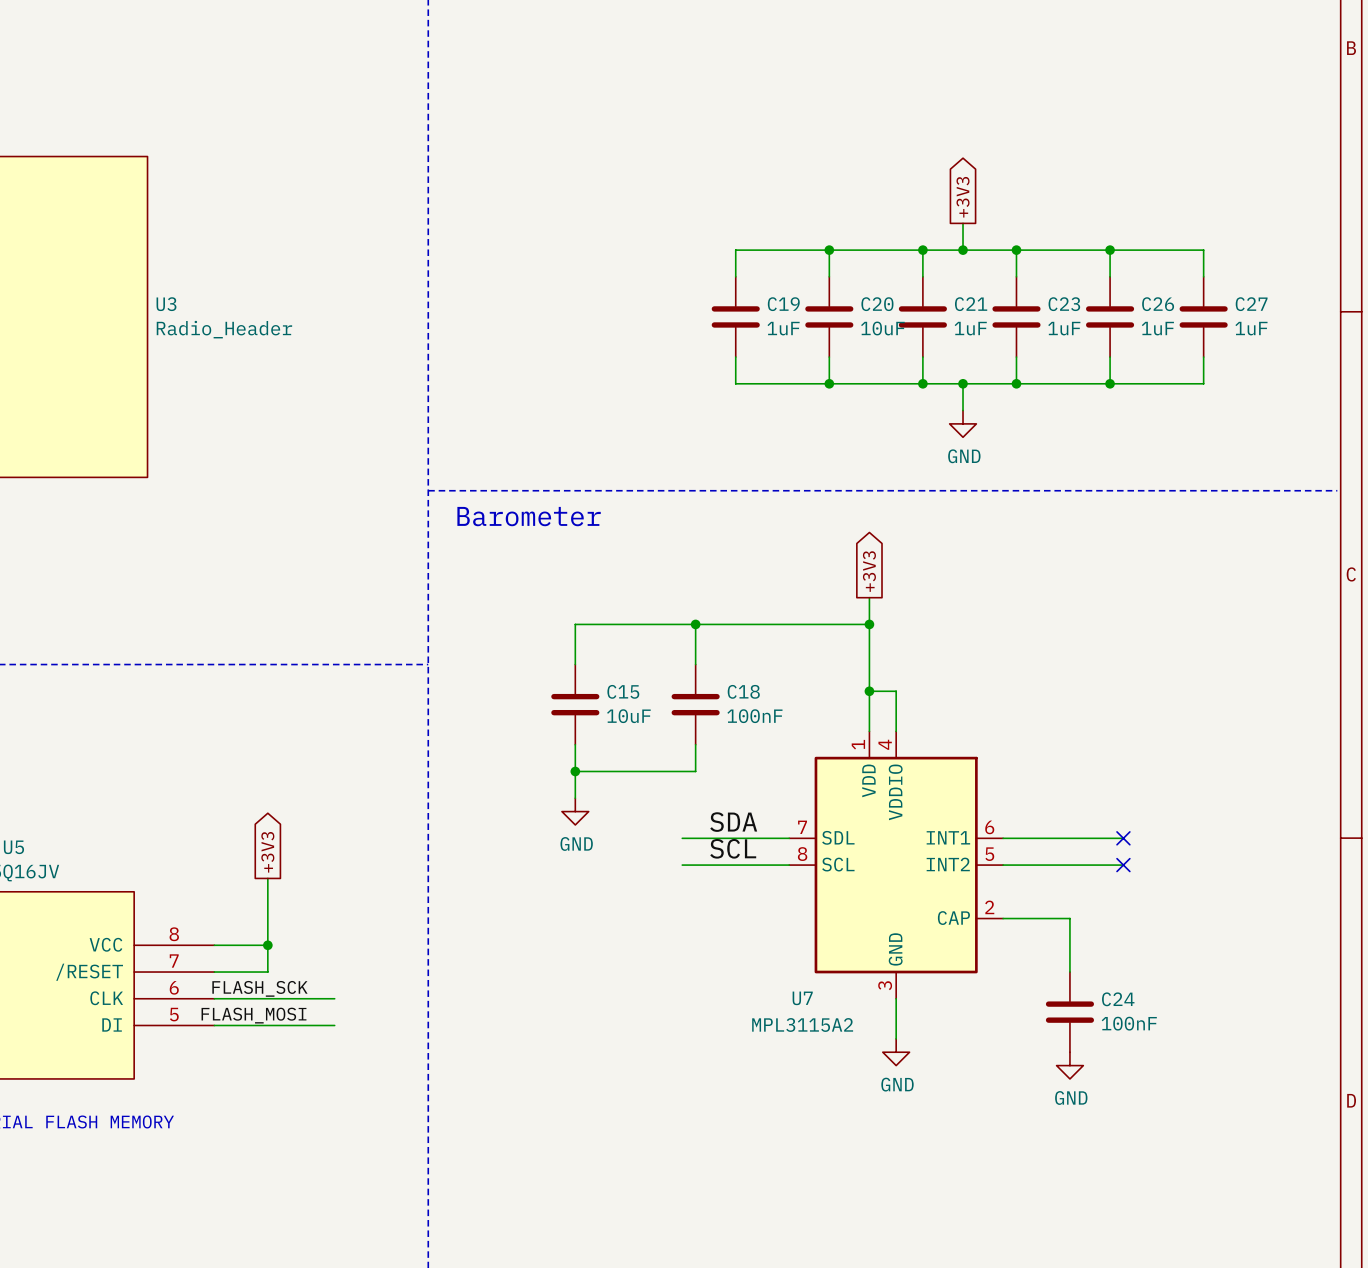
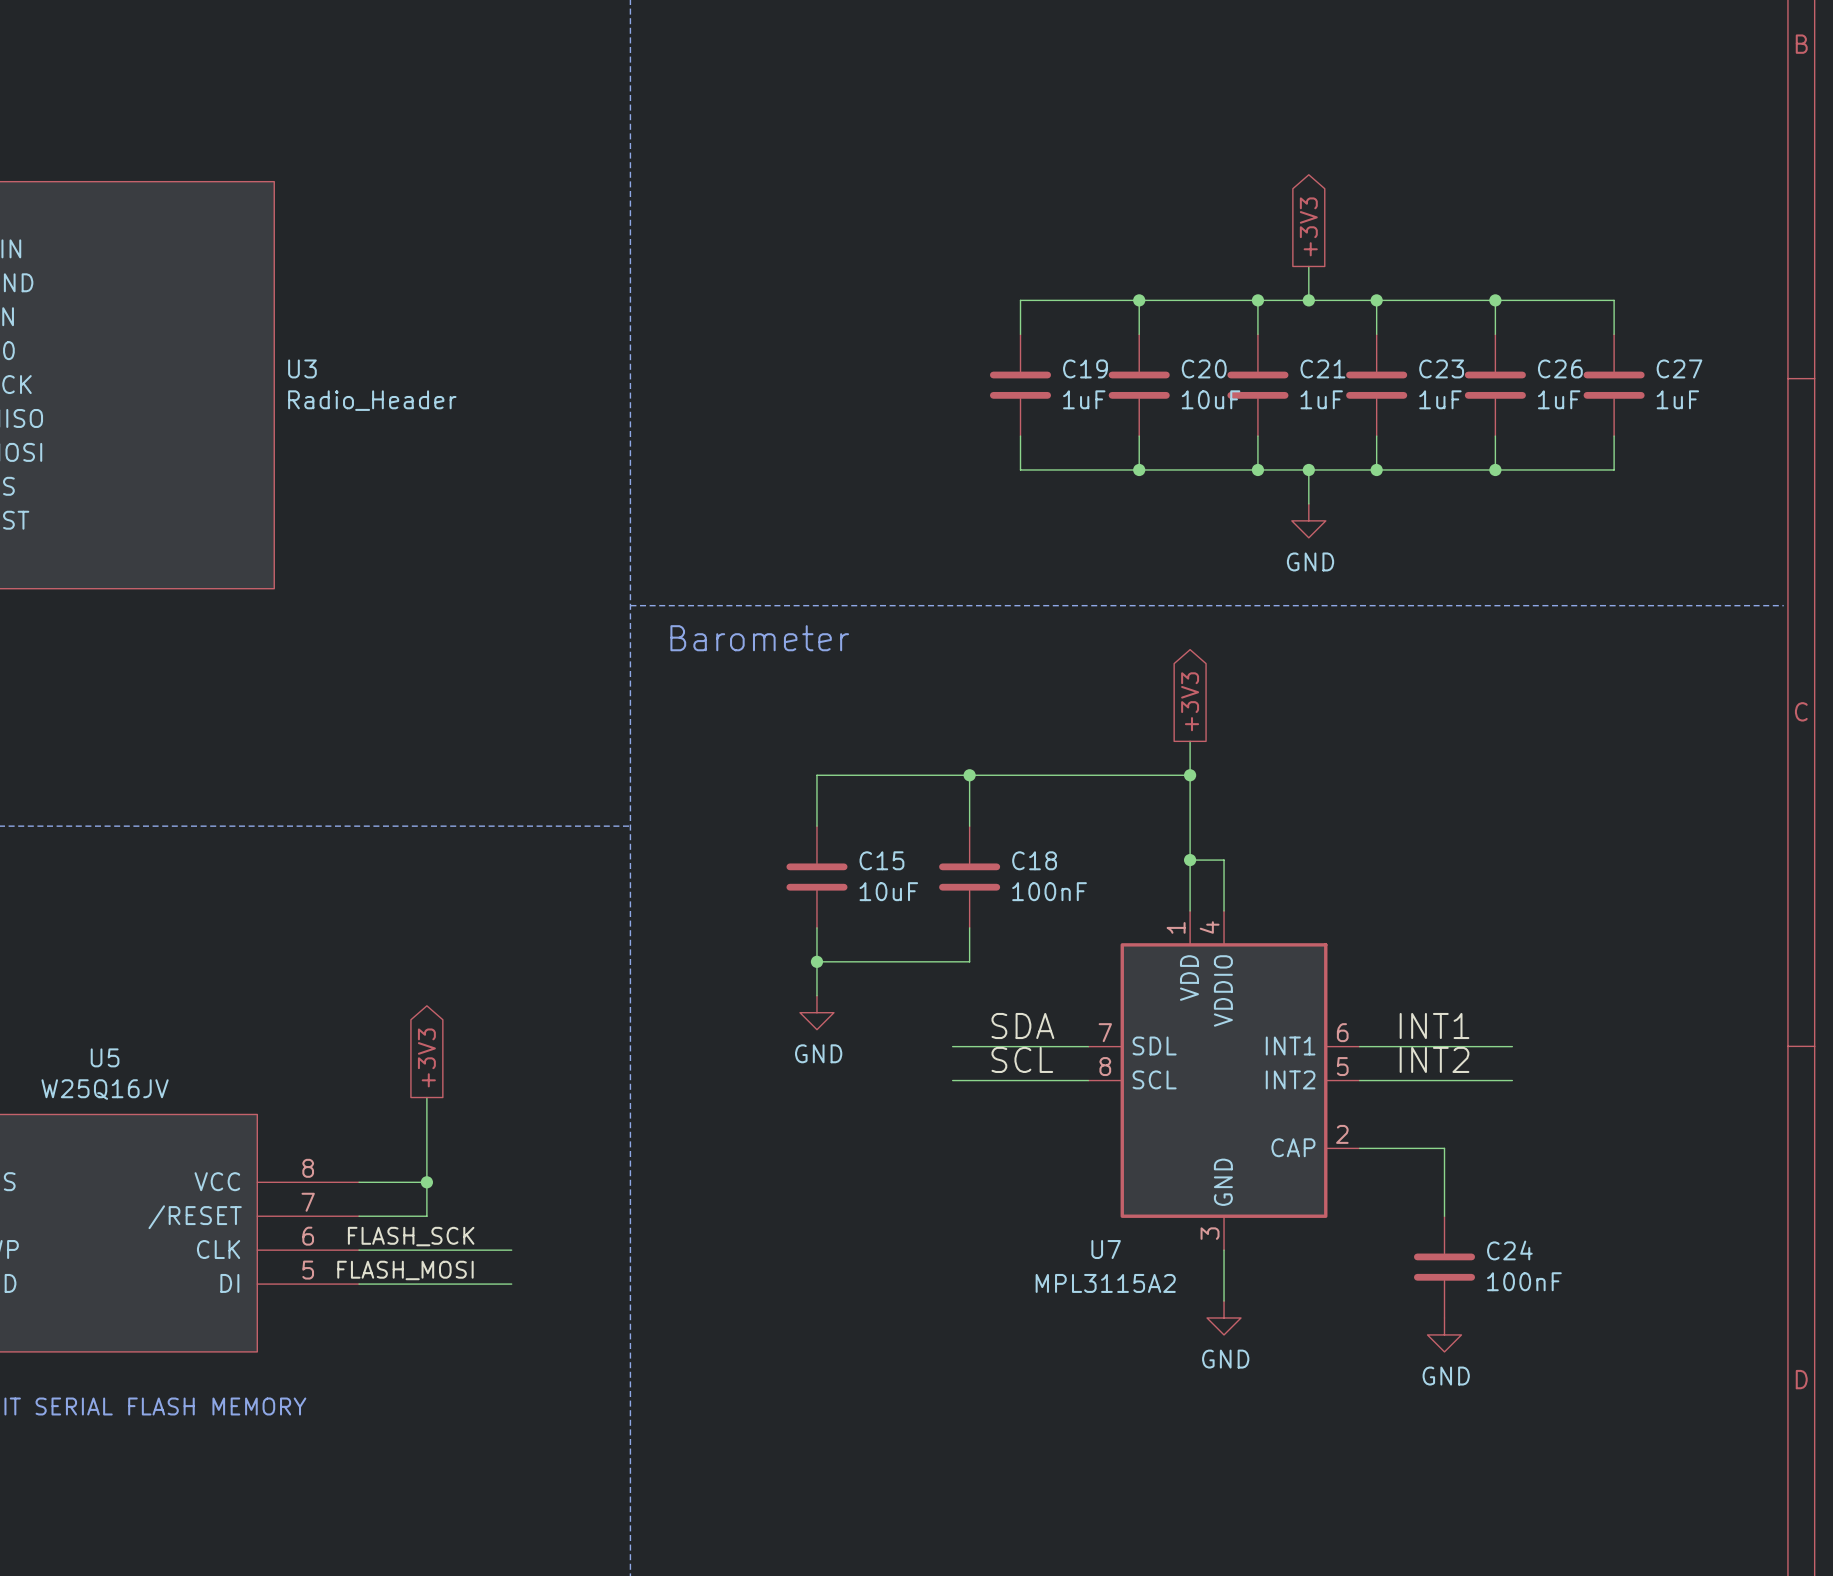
label: none -> INT1 (1434, 1025)
no-connect mark: (1123, 838) -> none
label: none -> INT2 (1434, 1059)
no-connect mark: (1123, 865) -> none

